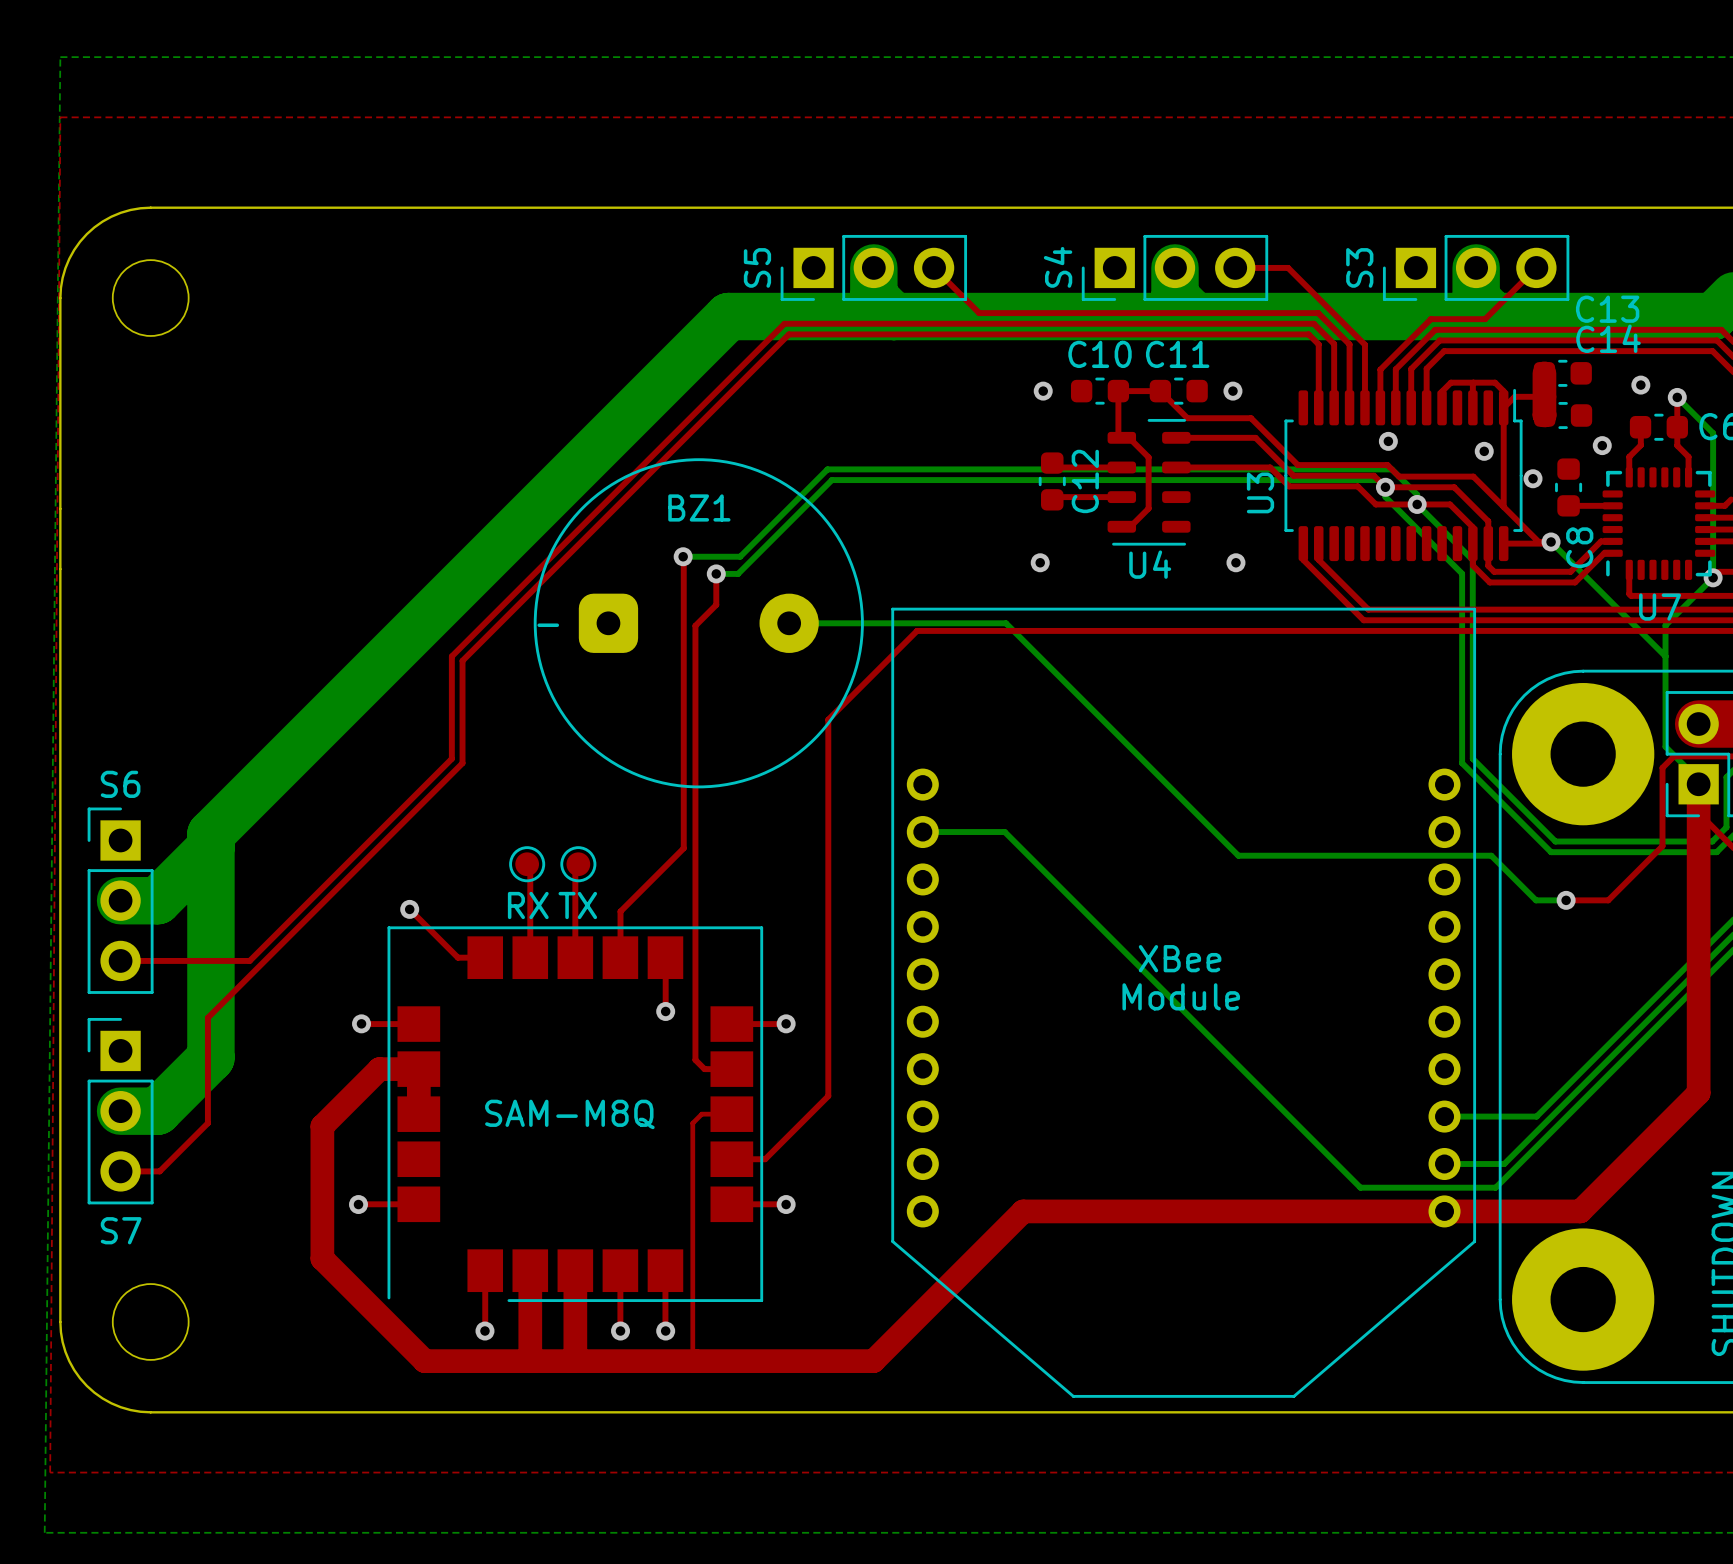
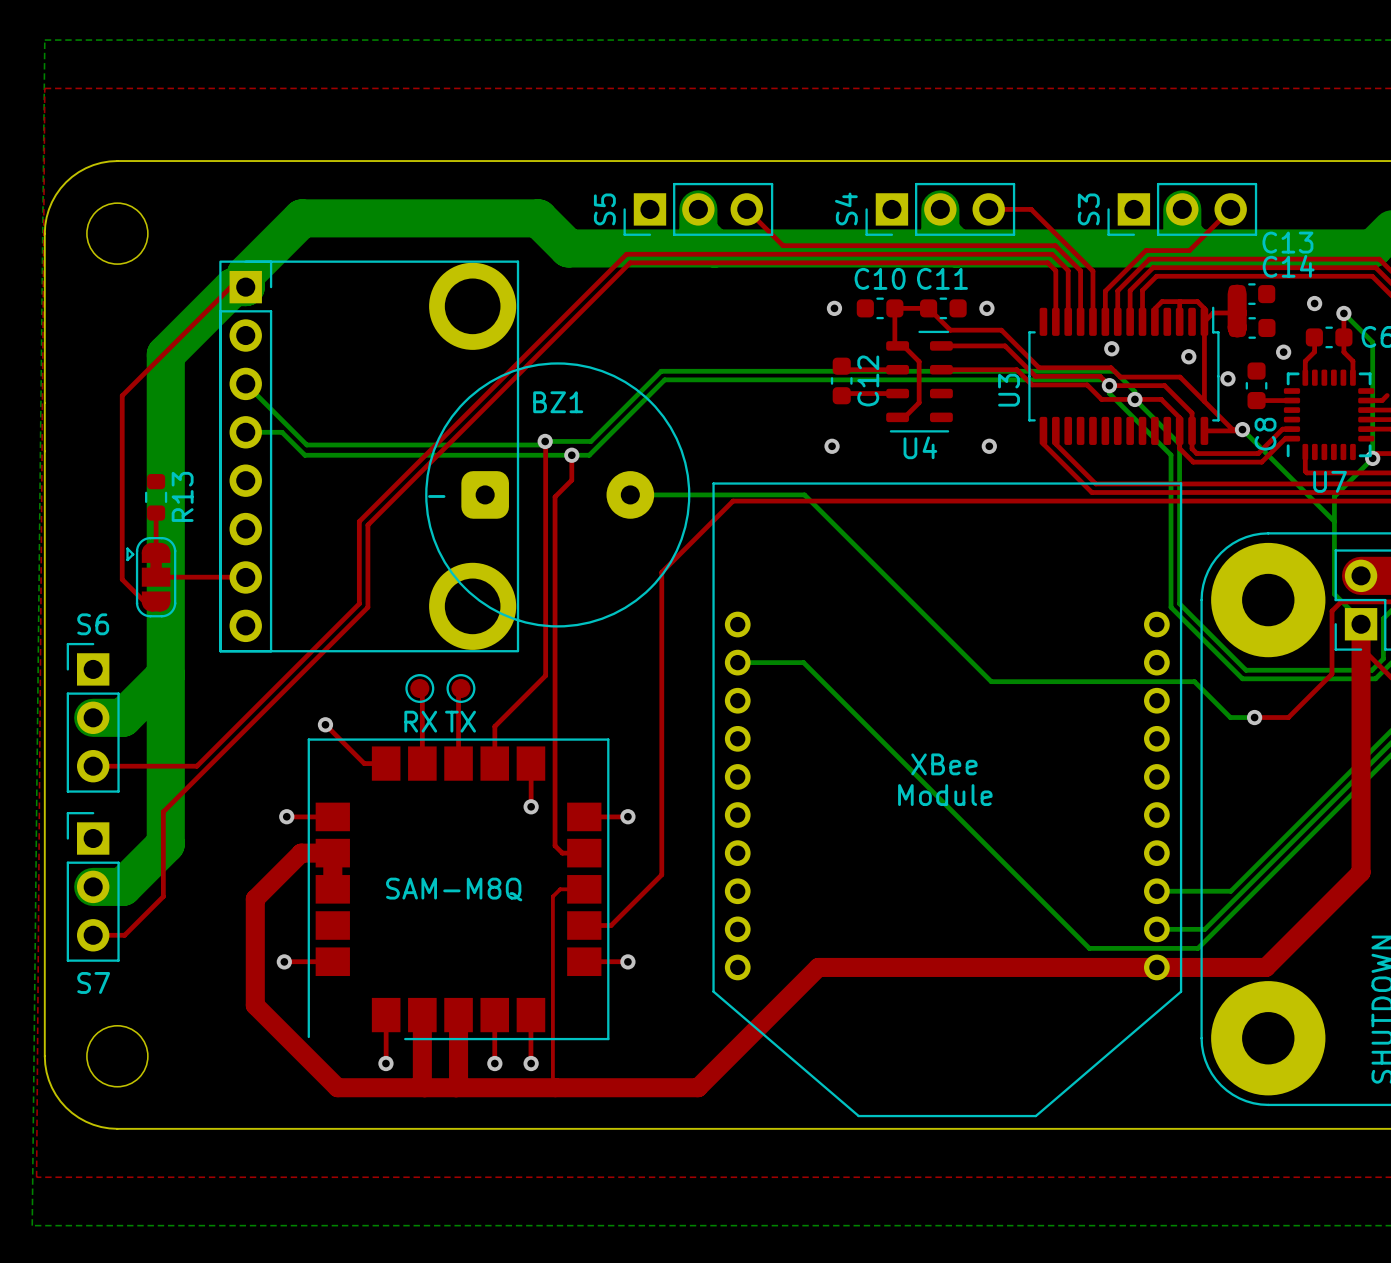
bottom track: (728, 316) (210, 834) -> (581, 248) (568, 248) (538, 218) (302, 218) (245, 274) (245, 287) (233, 287) (165, 354) (165, 664)
top track: none -> (244, 287) (230, 287) (122, 395) (122, 579) (144, 601)
bottom track: none -> (245, 383) (306, 445) (541, 445) (545, 441)
bottom track: none -> (245, 432) (282, 432) (304, 455) (571, 455)
part: none -> (369, 456)
R13: none -> (156, 497)
top track: none -> (156, 513) (156, 552)
part: none -> (151, 577)
top track: none -> (156, 577) (244, 577)

